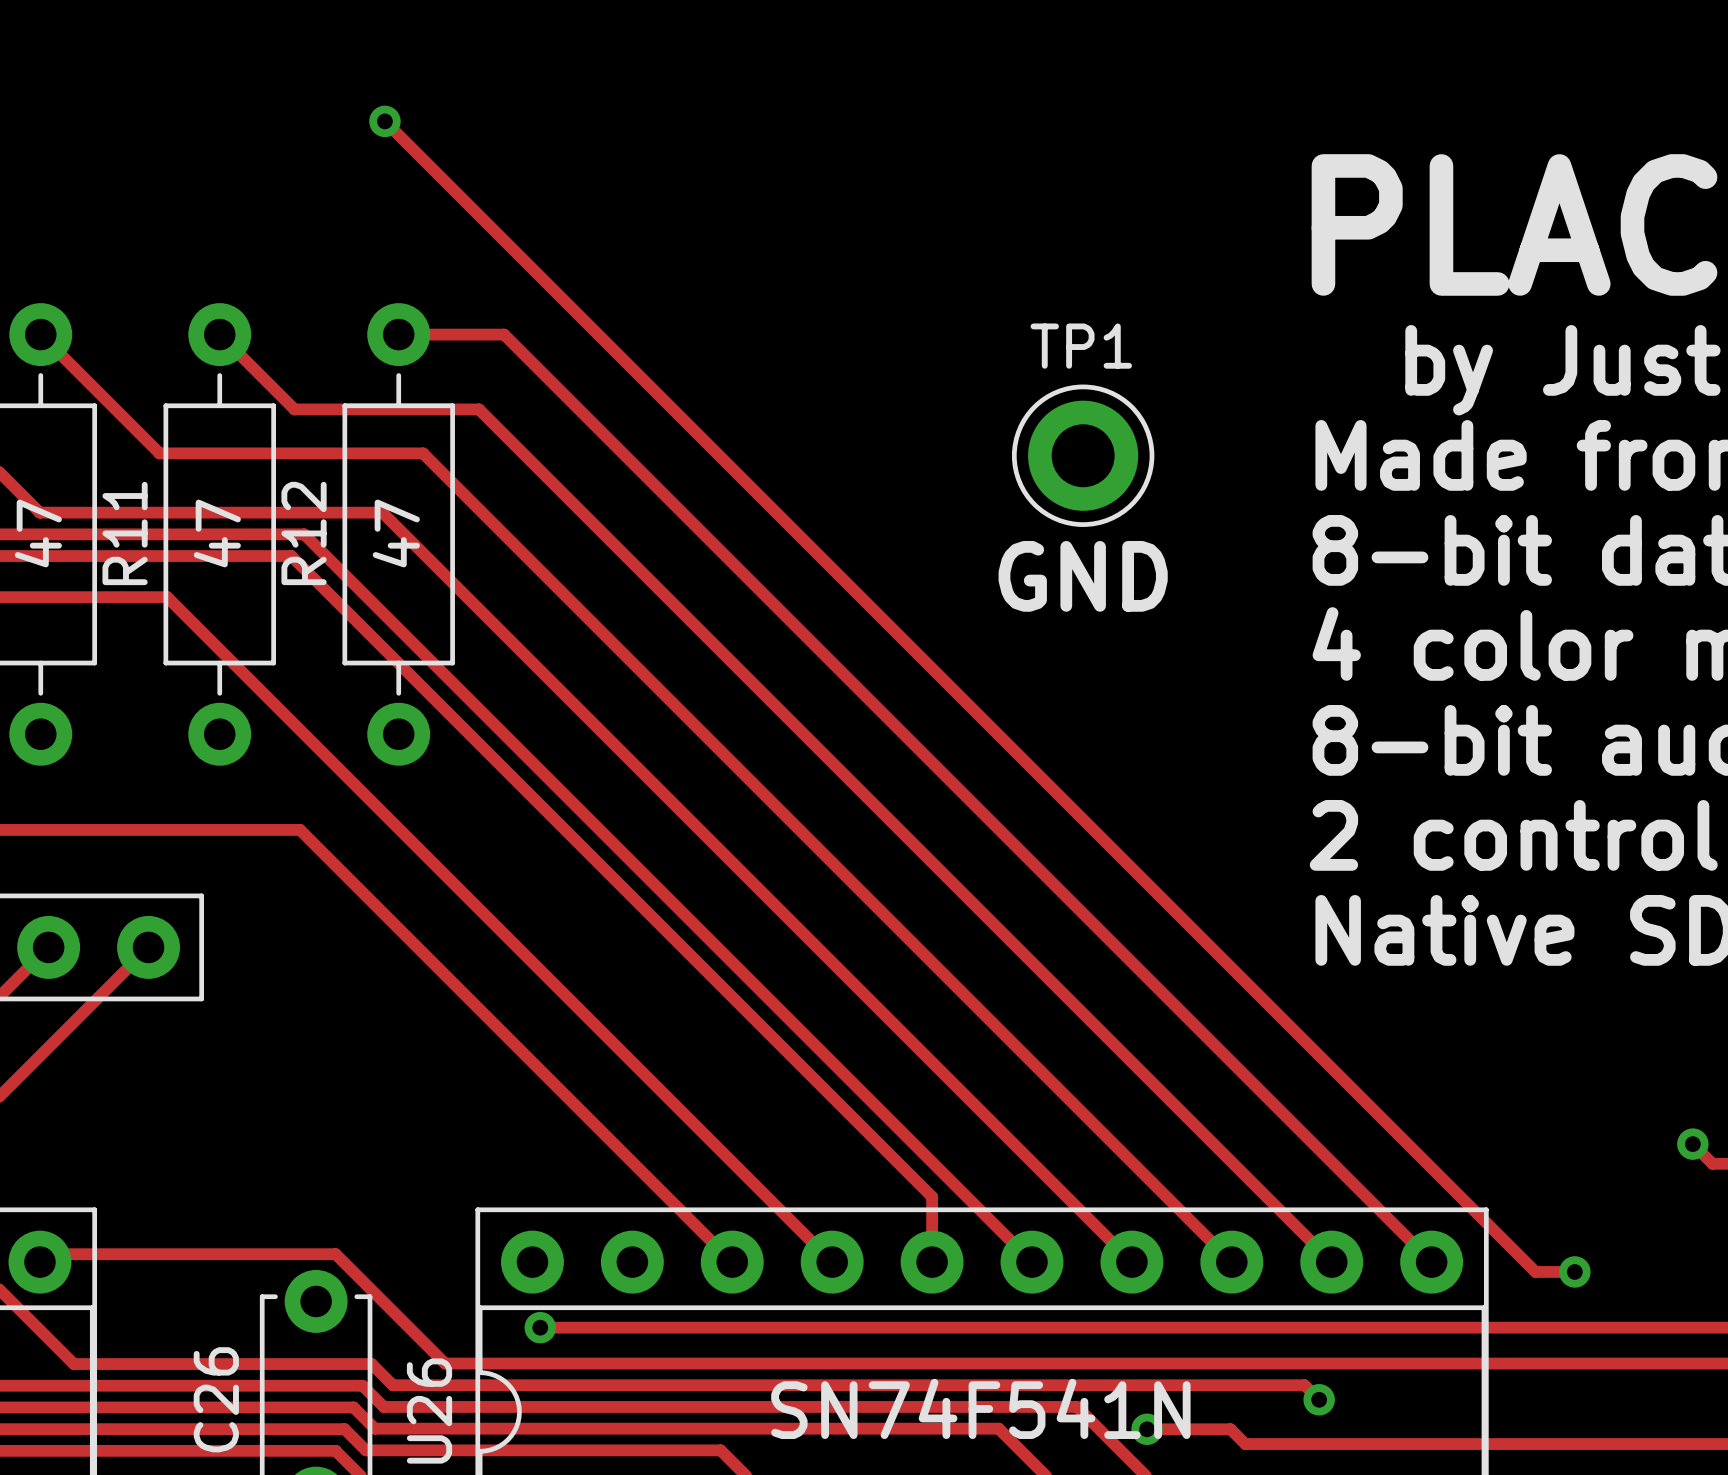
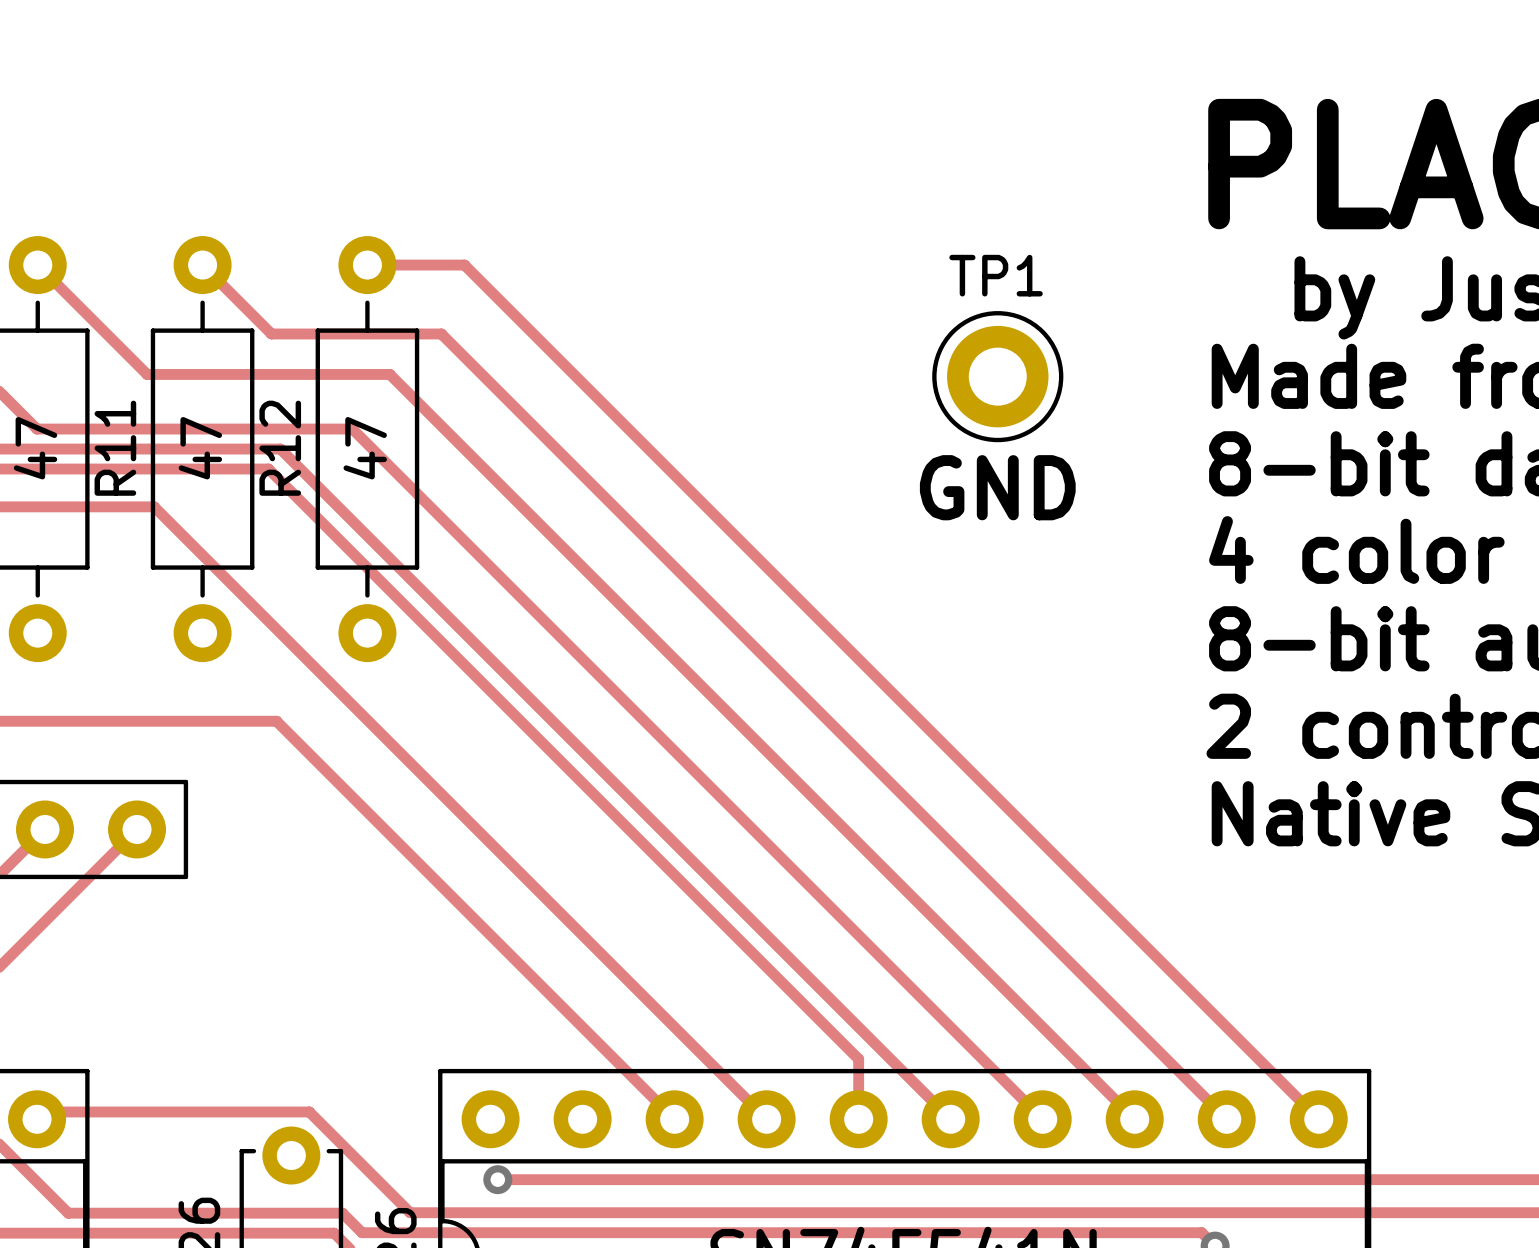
track: (384, 121) (1535, 1271) (1574, 1271) -> none
via: (384, 121) -> none
via: (1574, 1271) -> none

